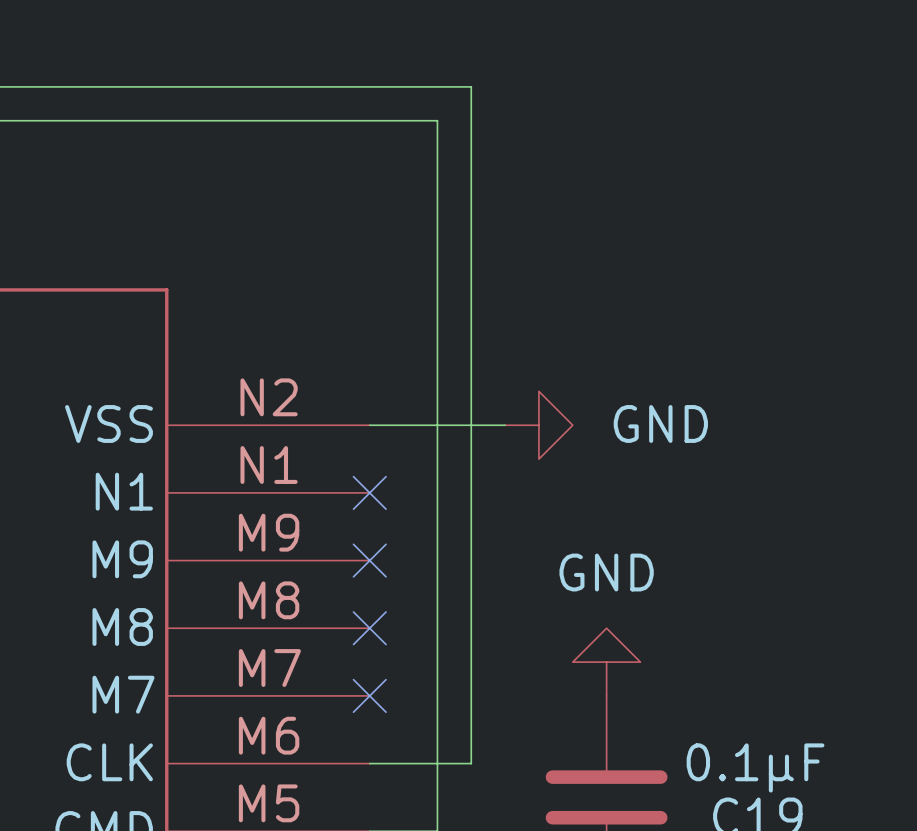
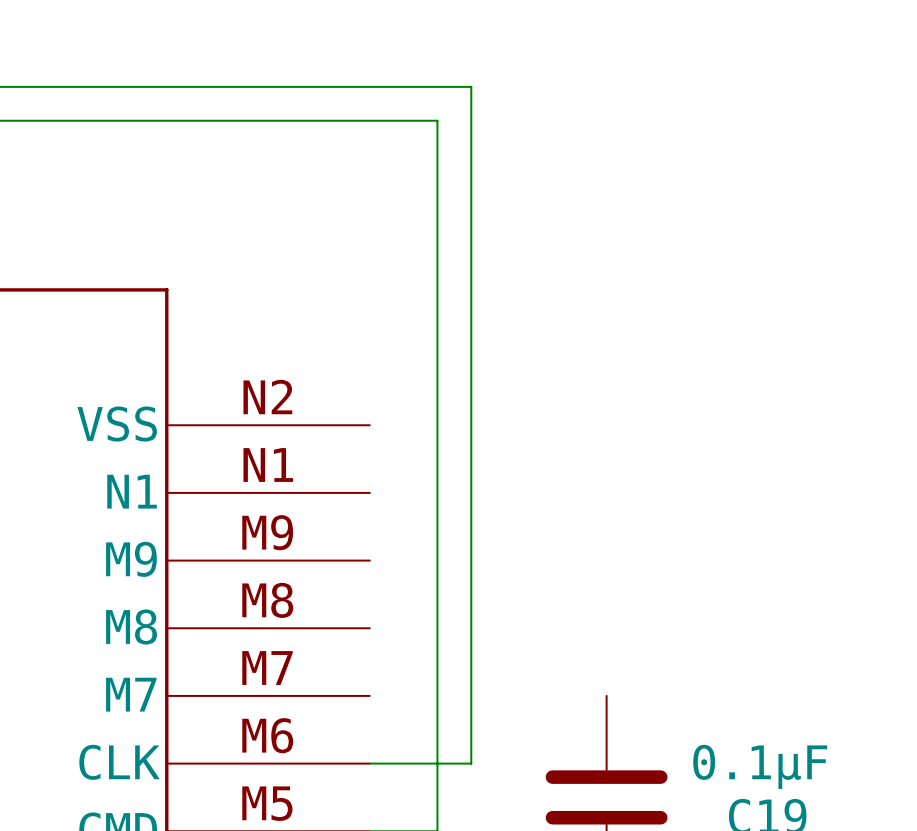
wire: (369, 425) (505, 425) -> none
power symbol: GND (538, 425) -> none
no-connect mark: (369, 492) -> none
no-connect mark: (369, 560) -> none
no-connect mark: (369, 628) -> none
power symbol: GND (606, 662) -> none
no-connect mark: (369, 695) -> none

